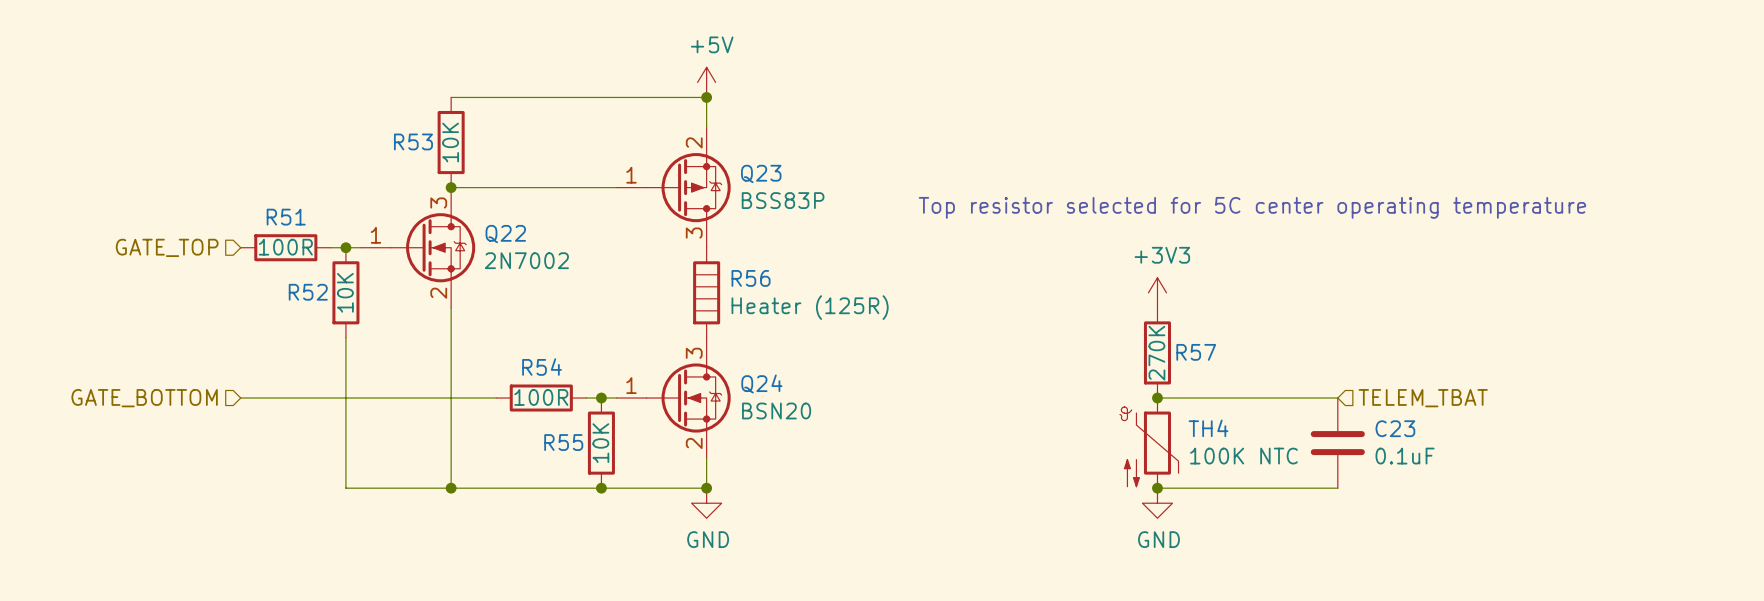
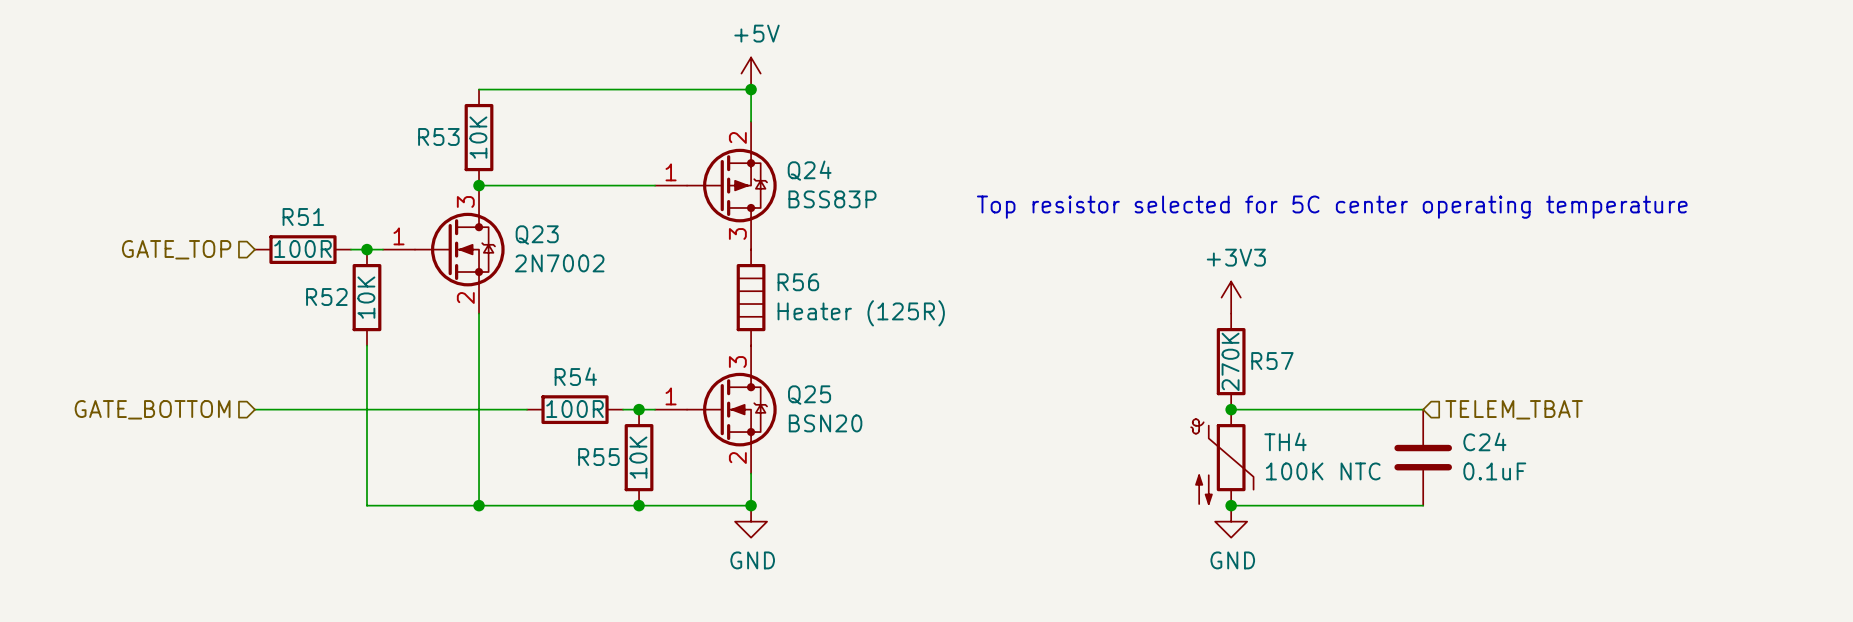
Q23 name: Q23 (761, 173) -> Q24 (809, 170)
Q22 name: Q22 (505, 234) -> Q23 (537, 235)
Q24 name: Q24 (761, 383) -> Q25 (809, 395)
C23 name: C23 (1395, 428) -> C24 (1484, 441)

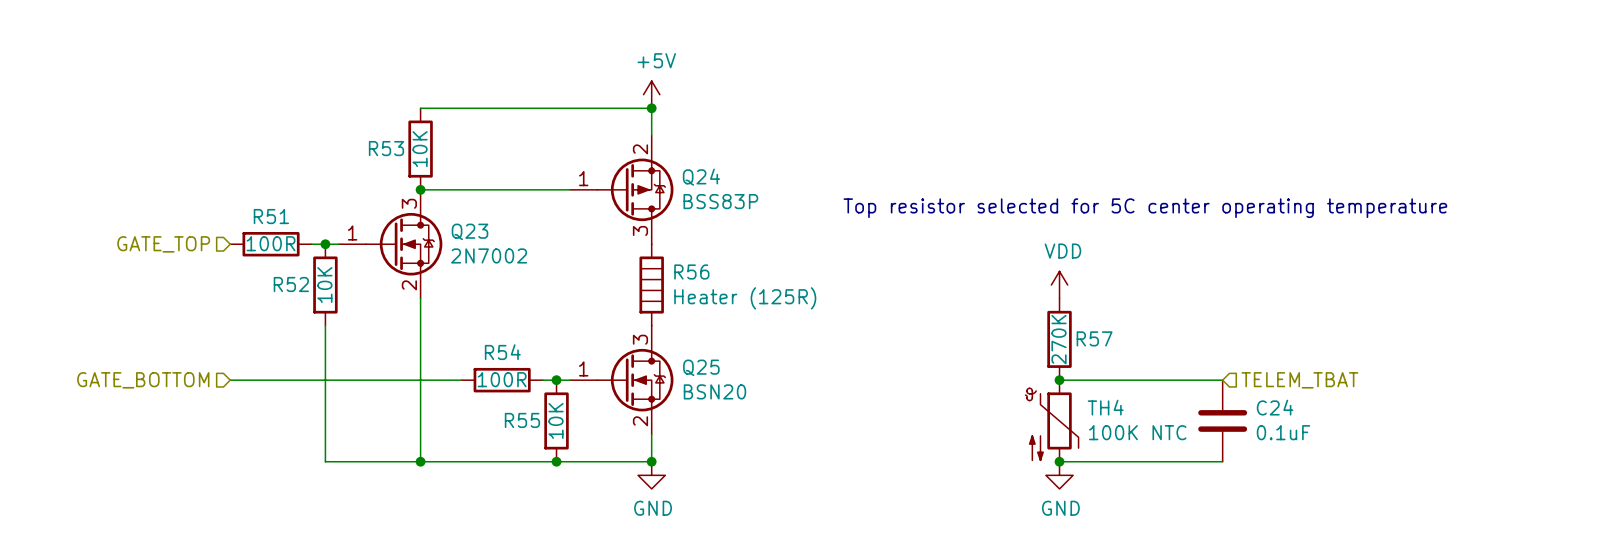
power symbol: +3V3 (1231, 297) -> VDD (1059, 285)

